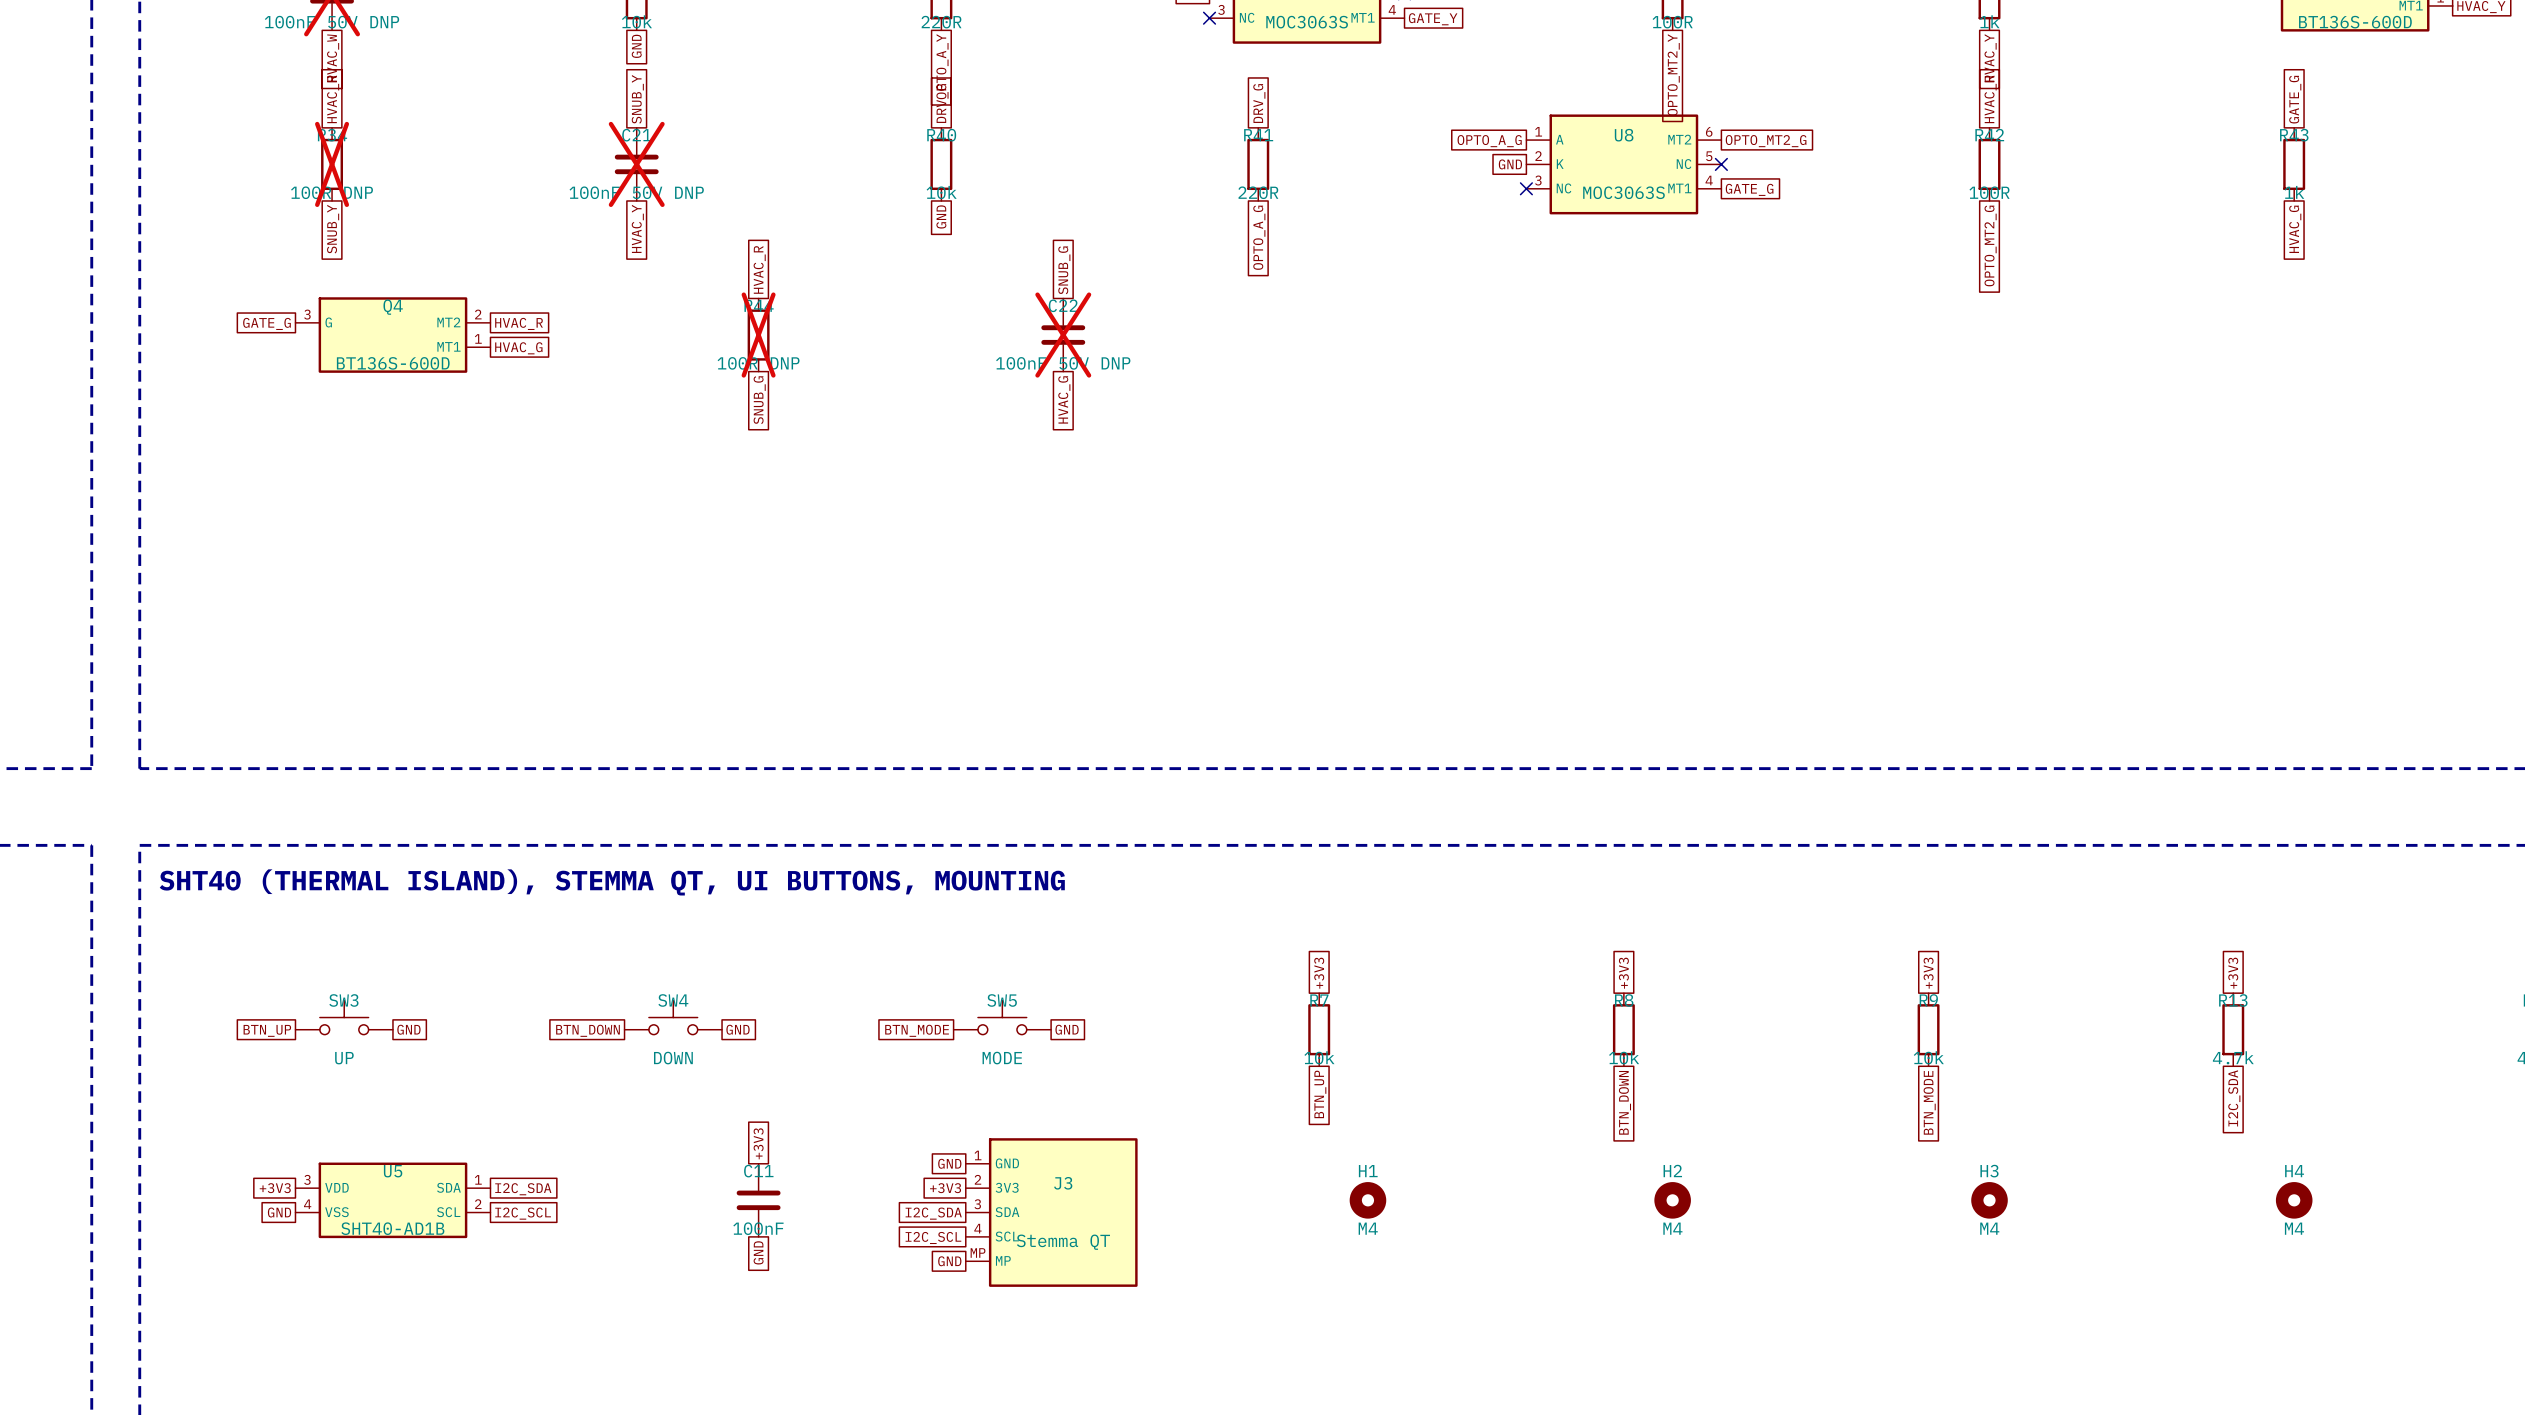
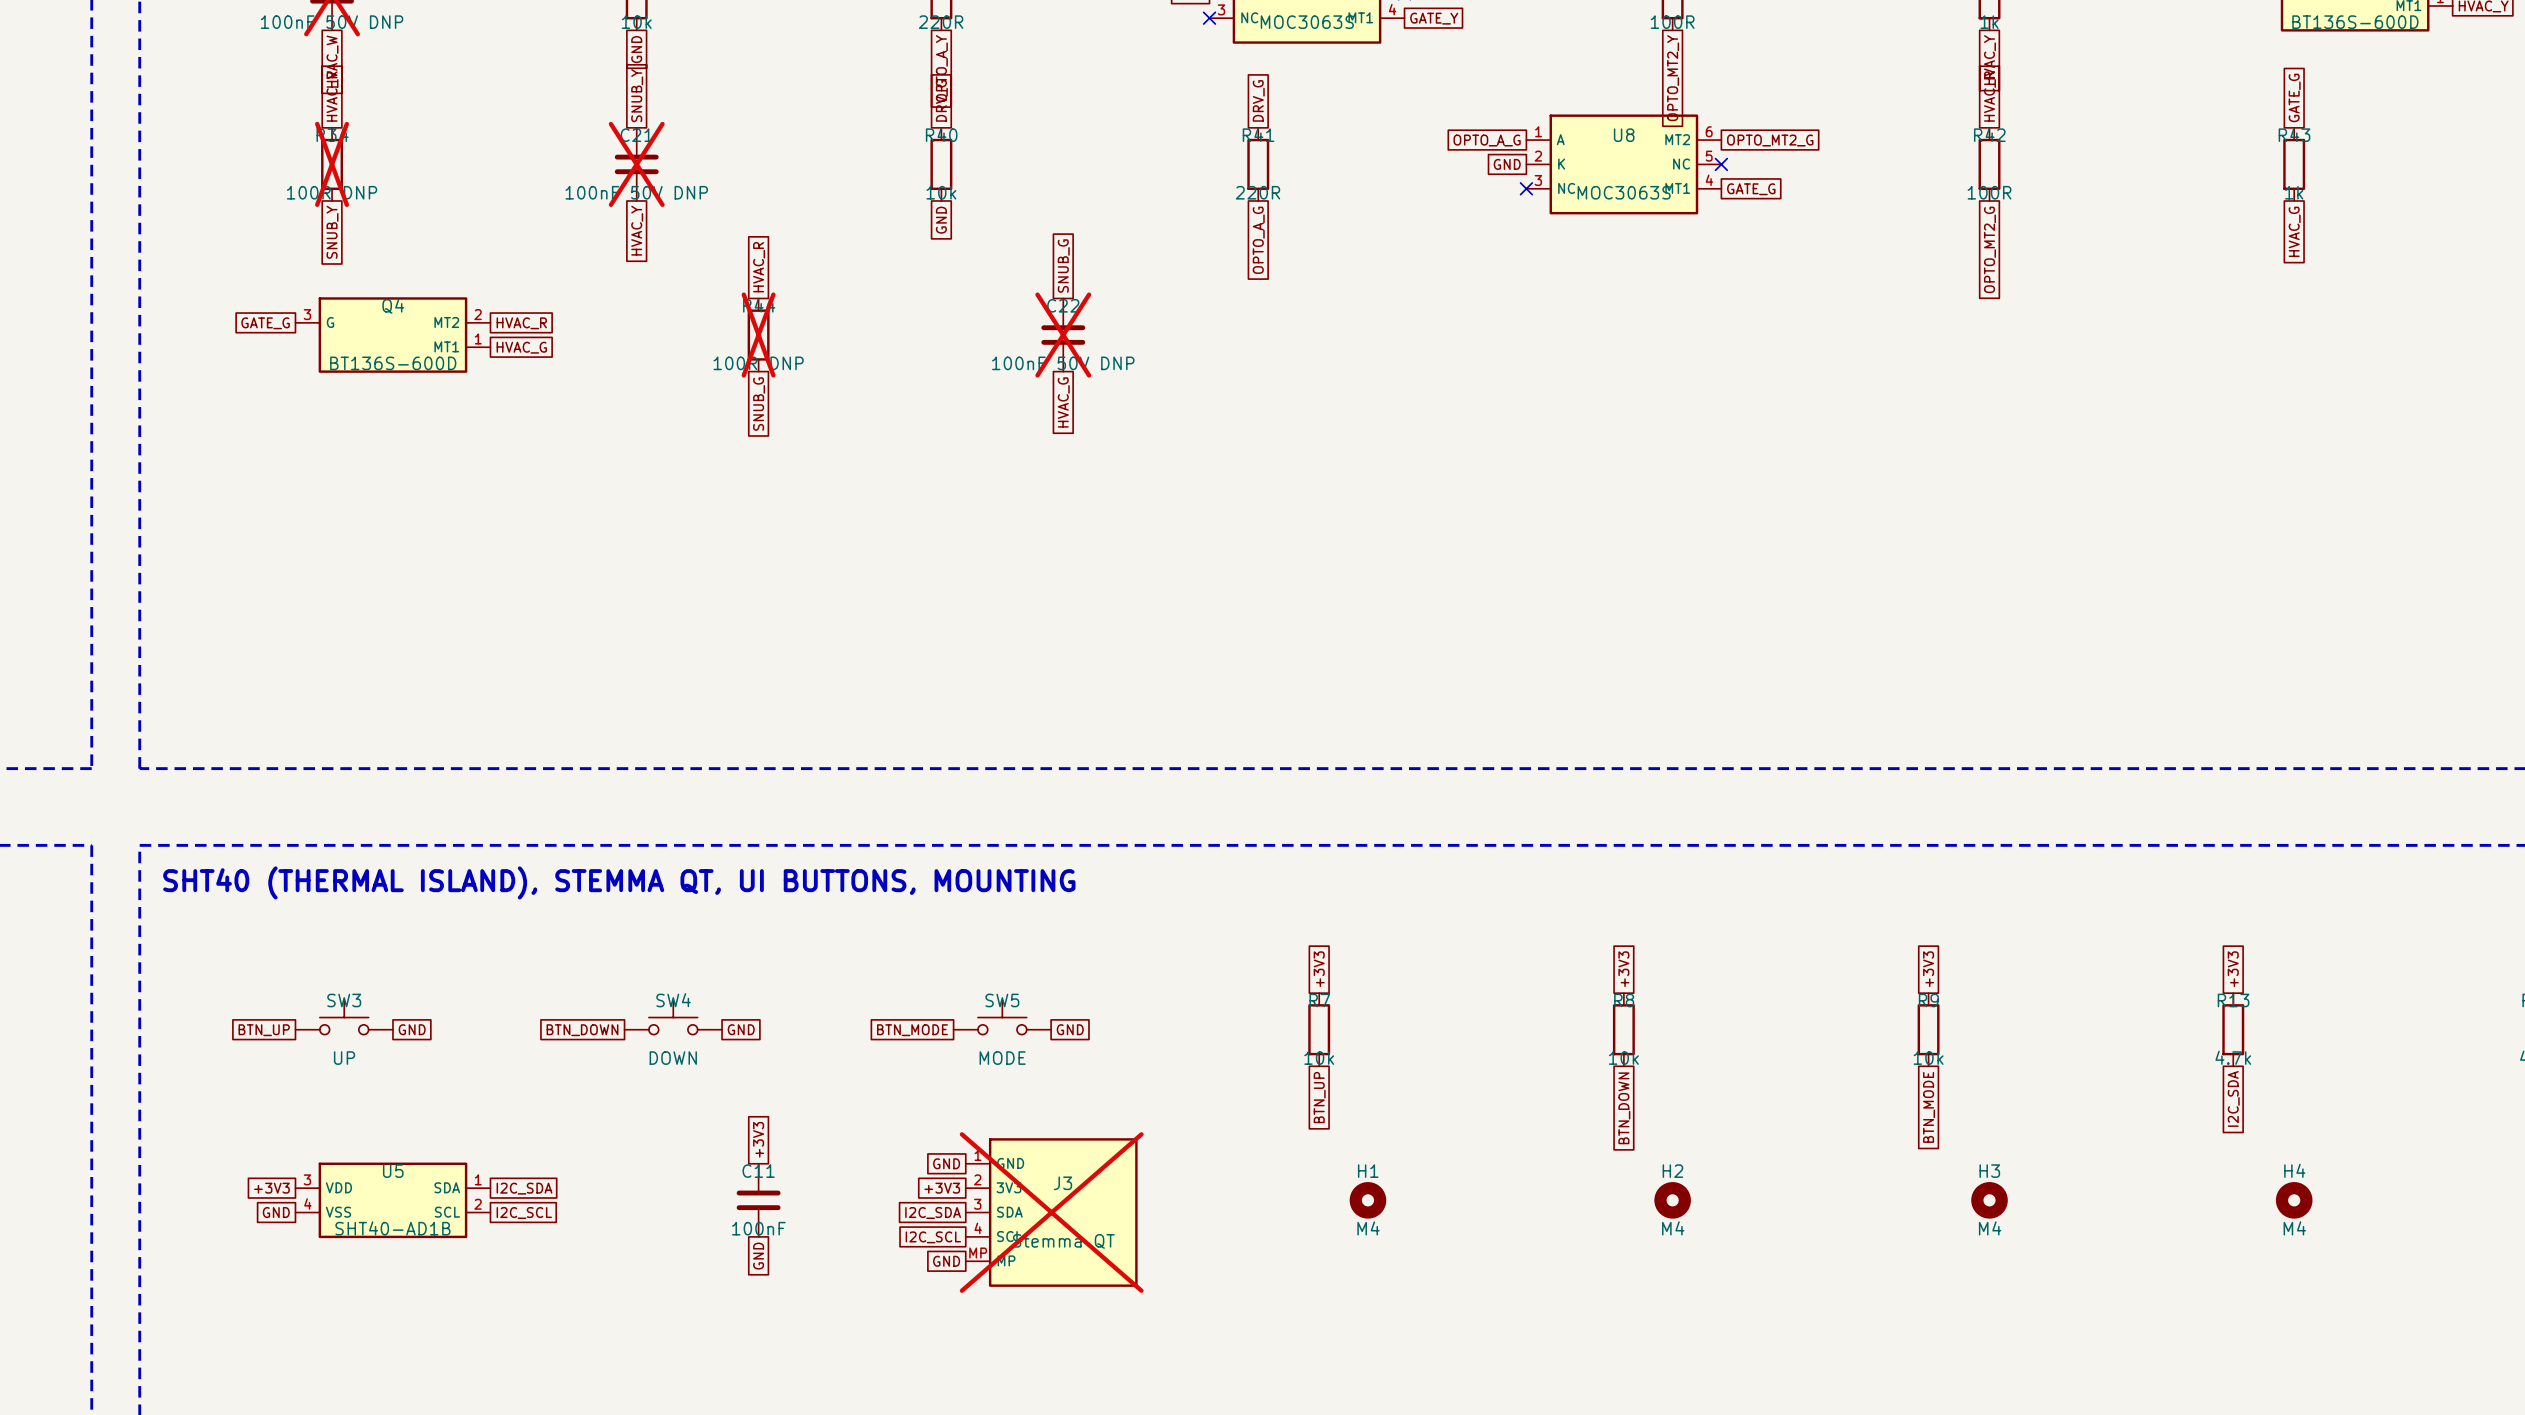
J3 do-not-place cross: none -> (1051, 1212)

